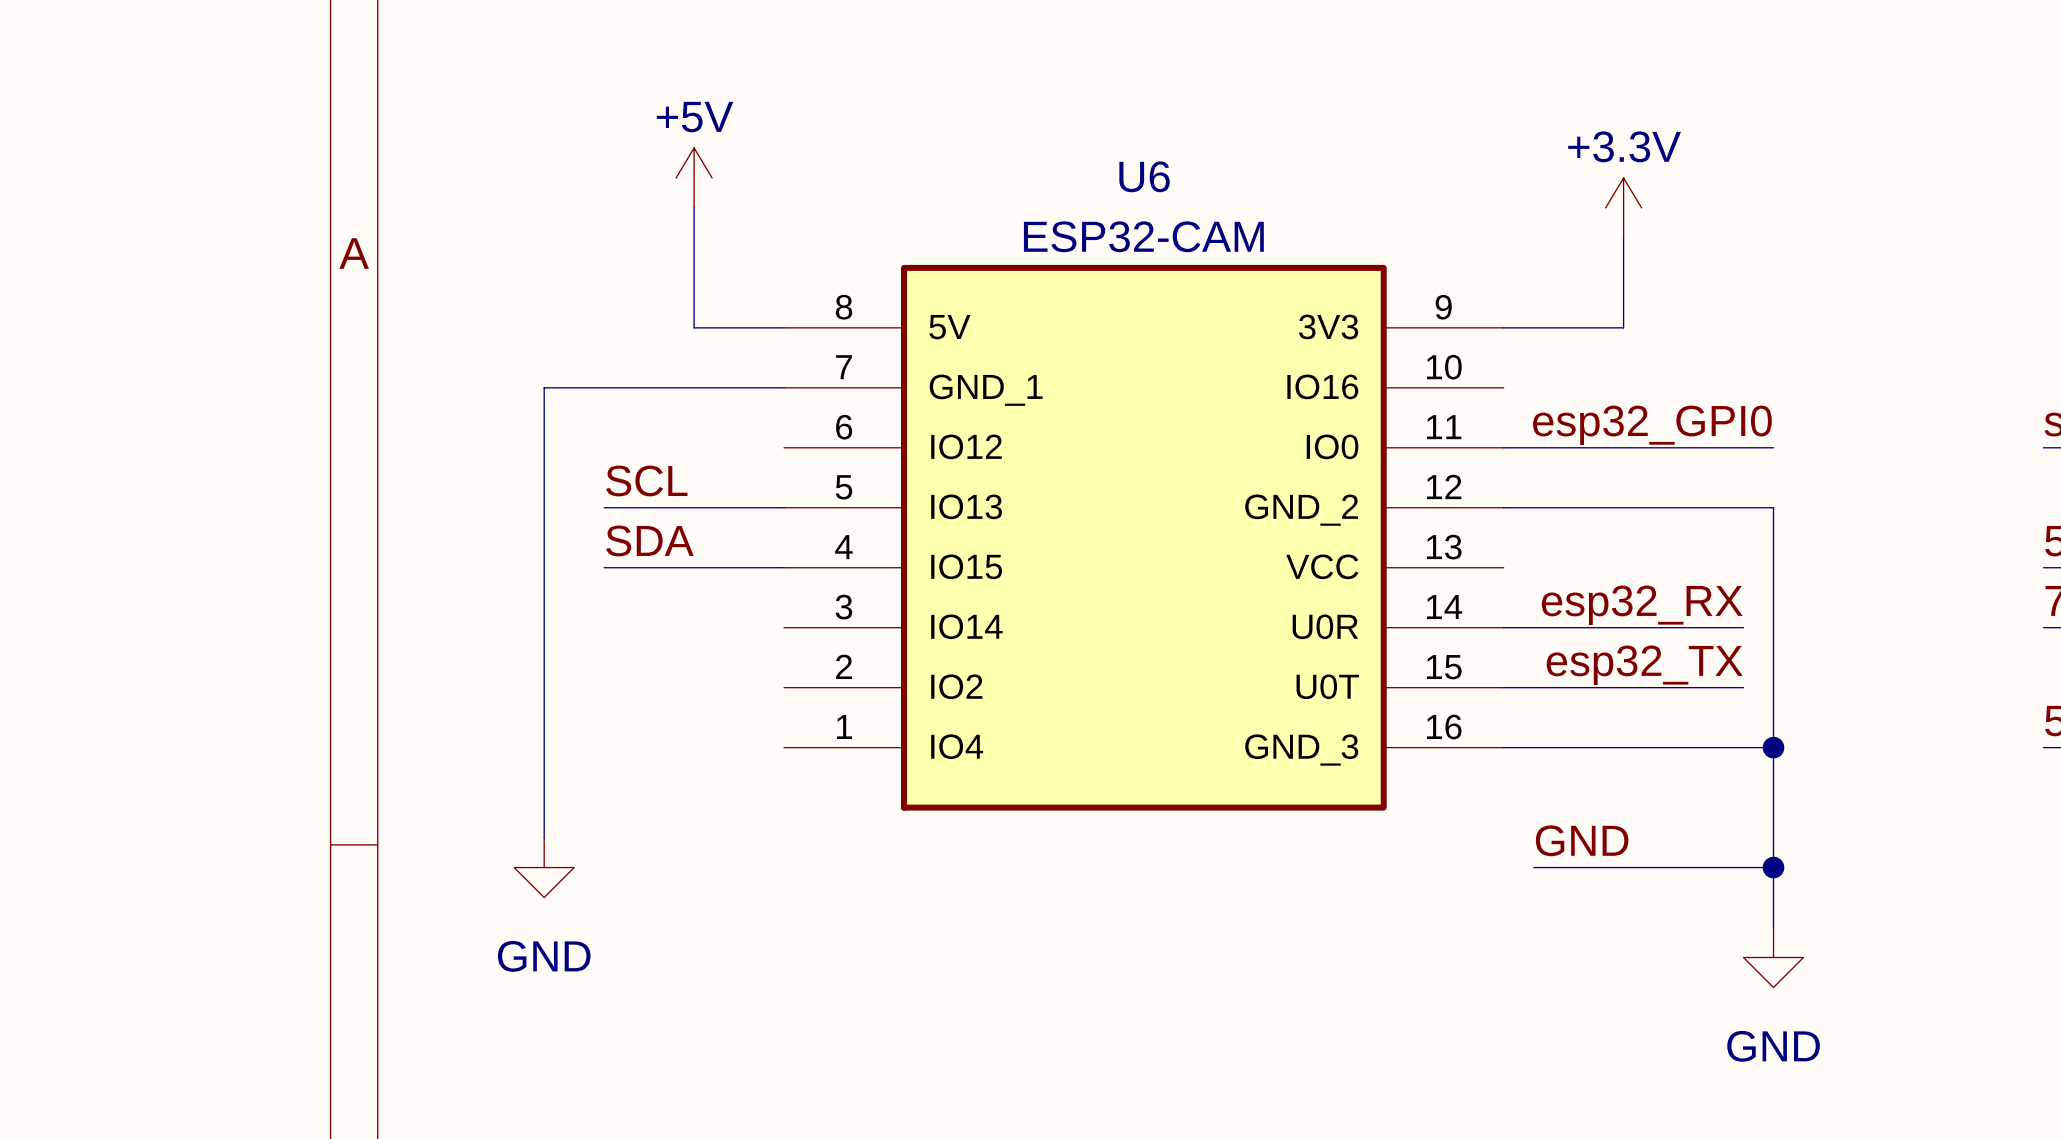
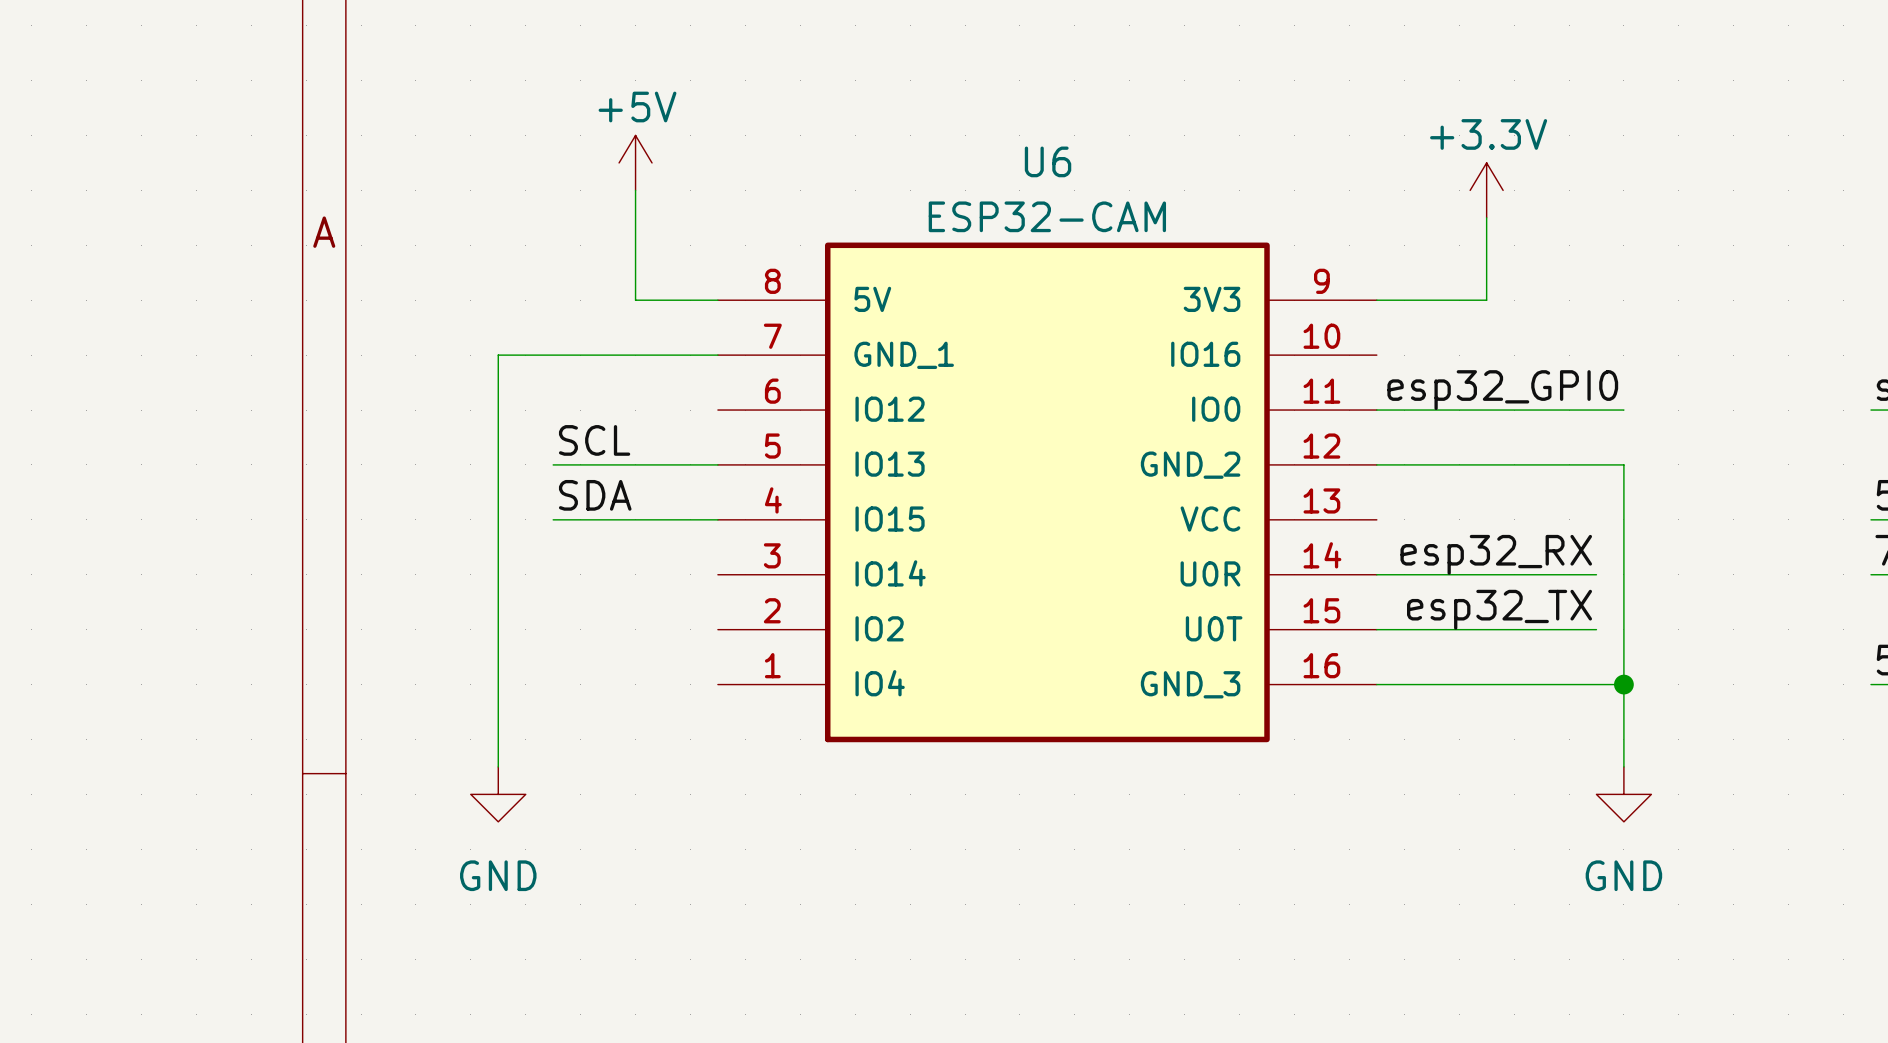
wire: (1773, 837) (1773, 927) -> none
label: GND (1582, 840) -> none
wire: (1533, 867) (1773, 867) -> none
junction: (1773, 867) -> none
power symbol position: GND (1773, 957) -> GND (1623, 794)

